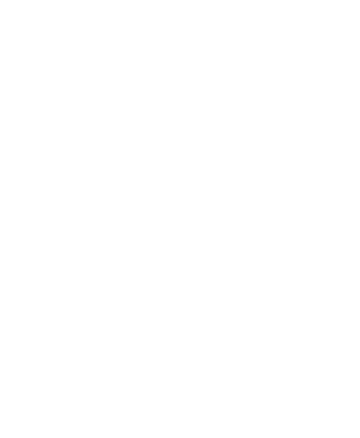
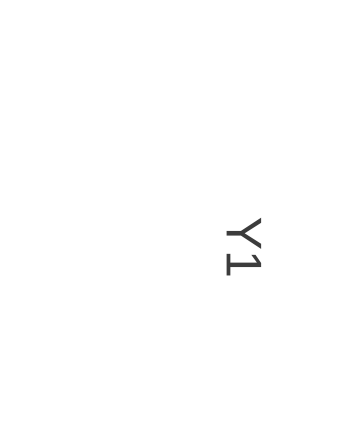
Y1: none -> (243, 246)

